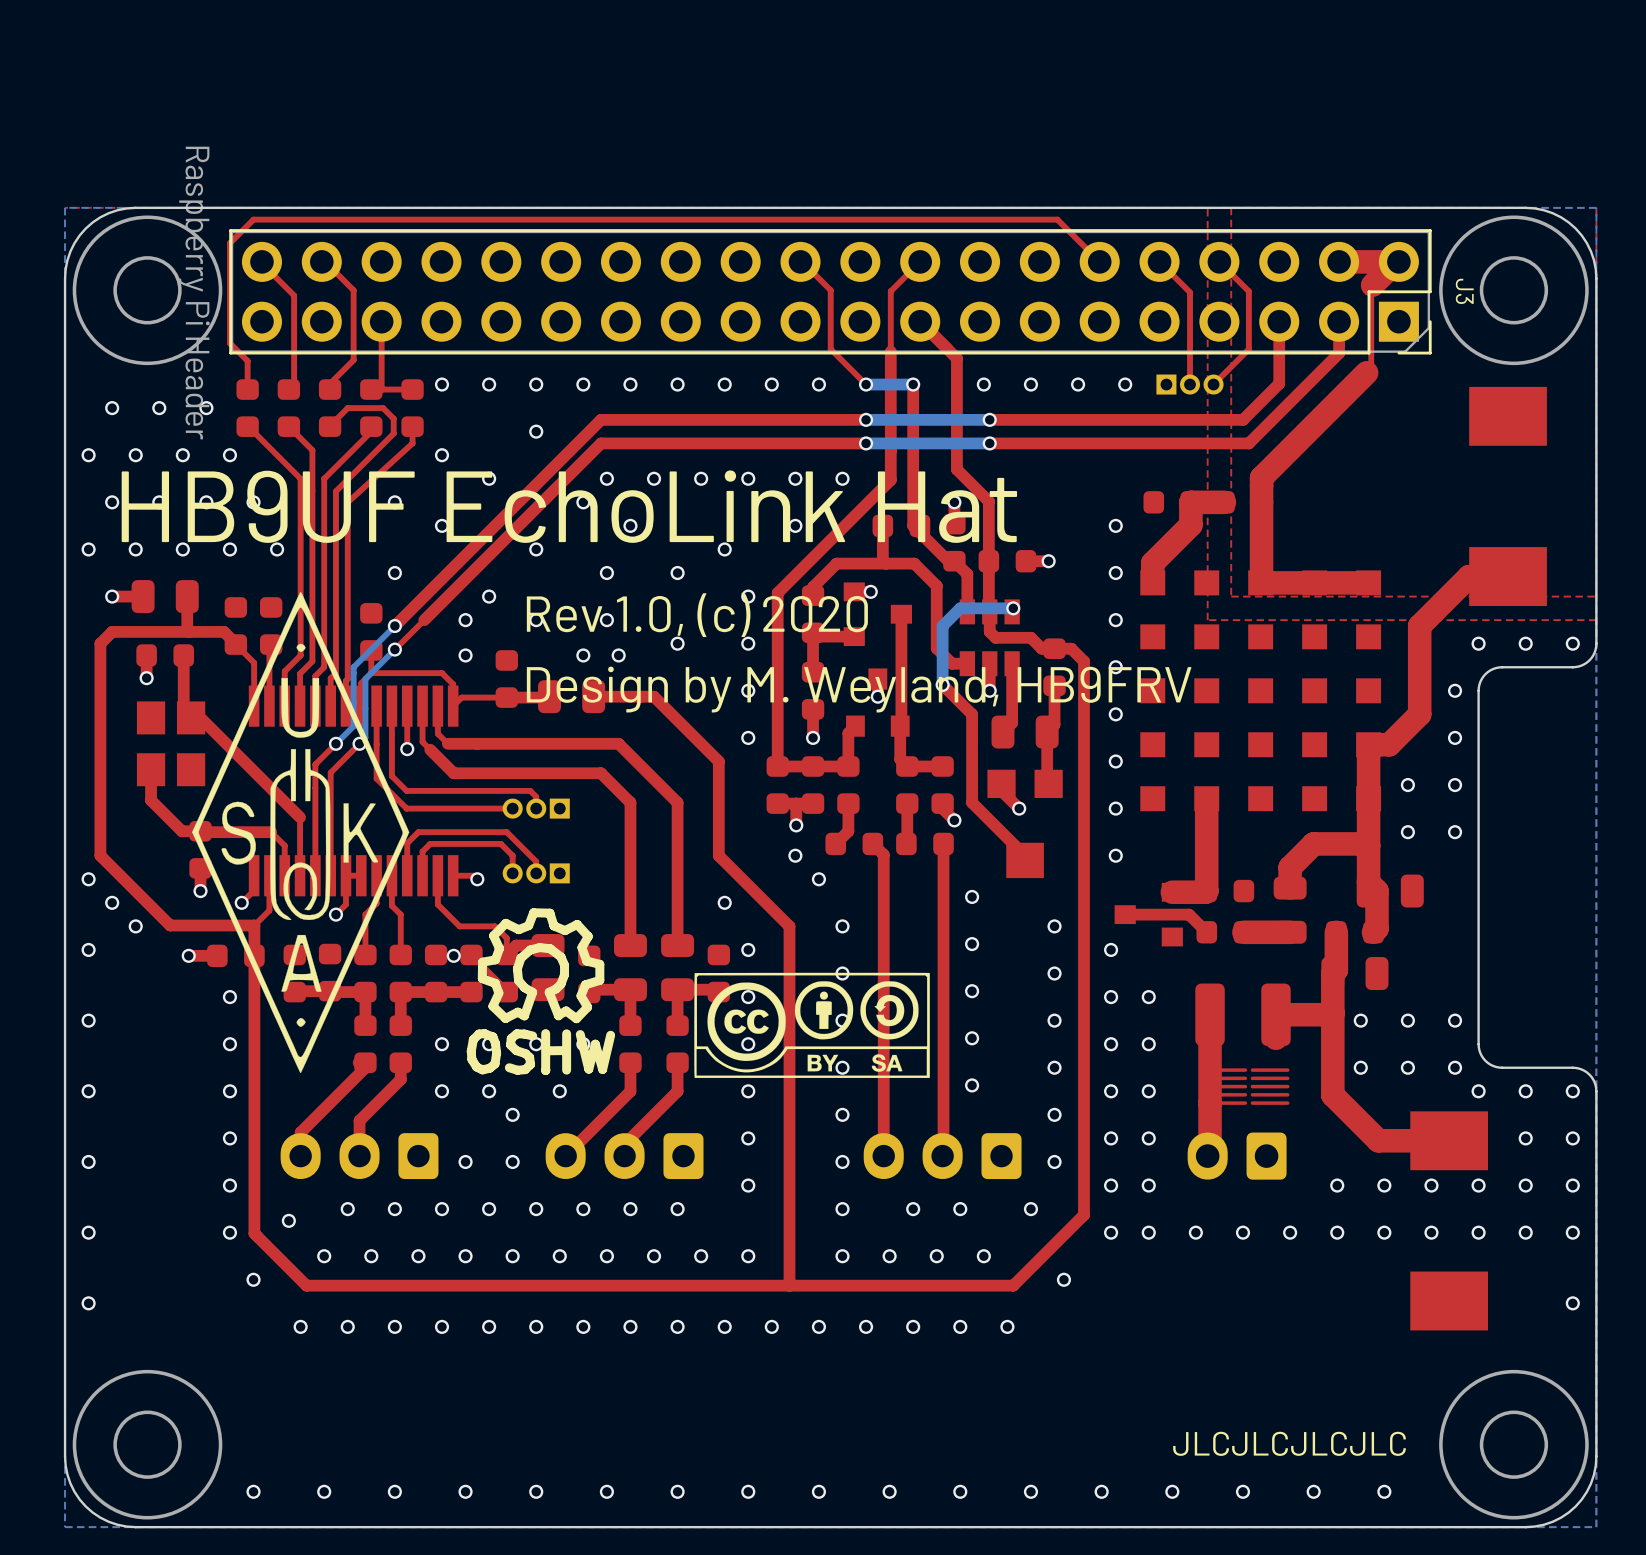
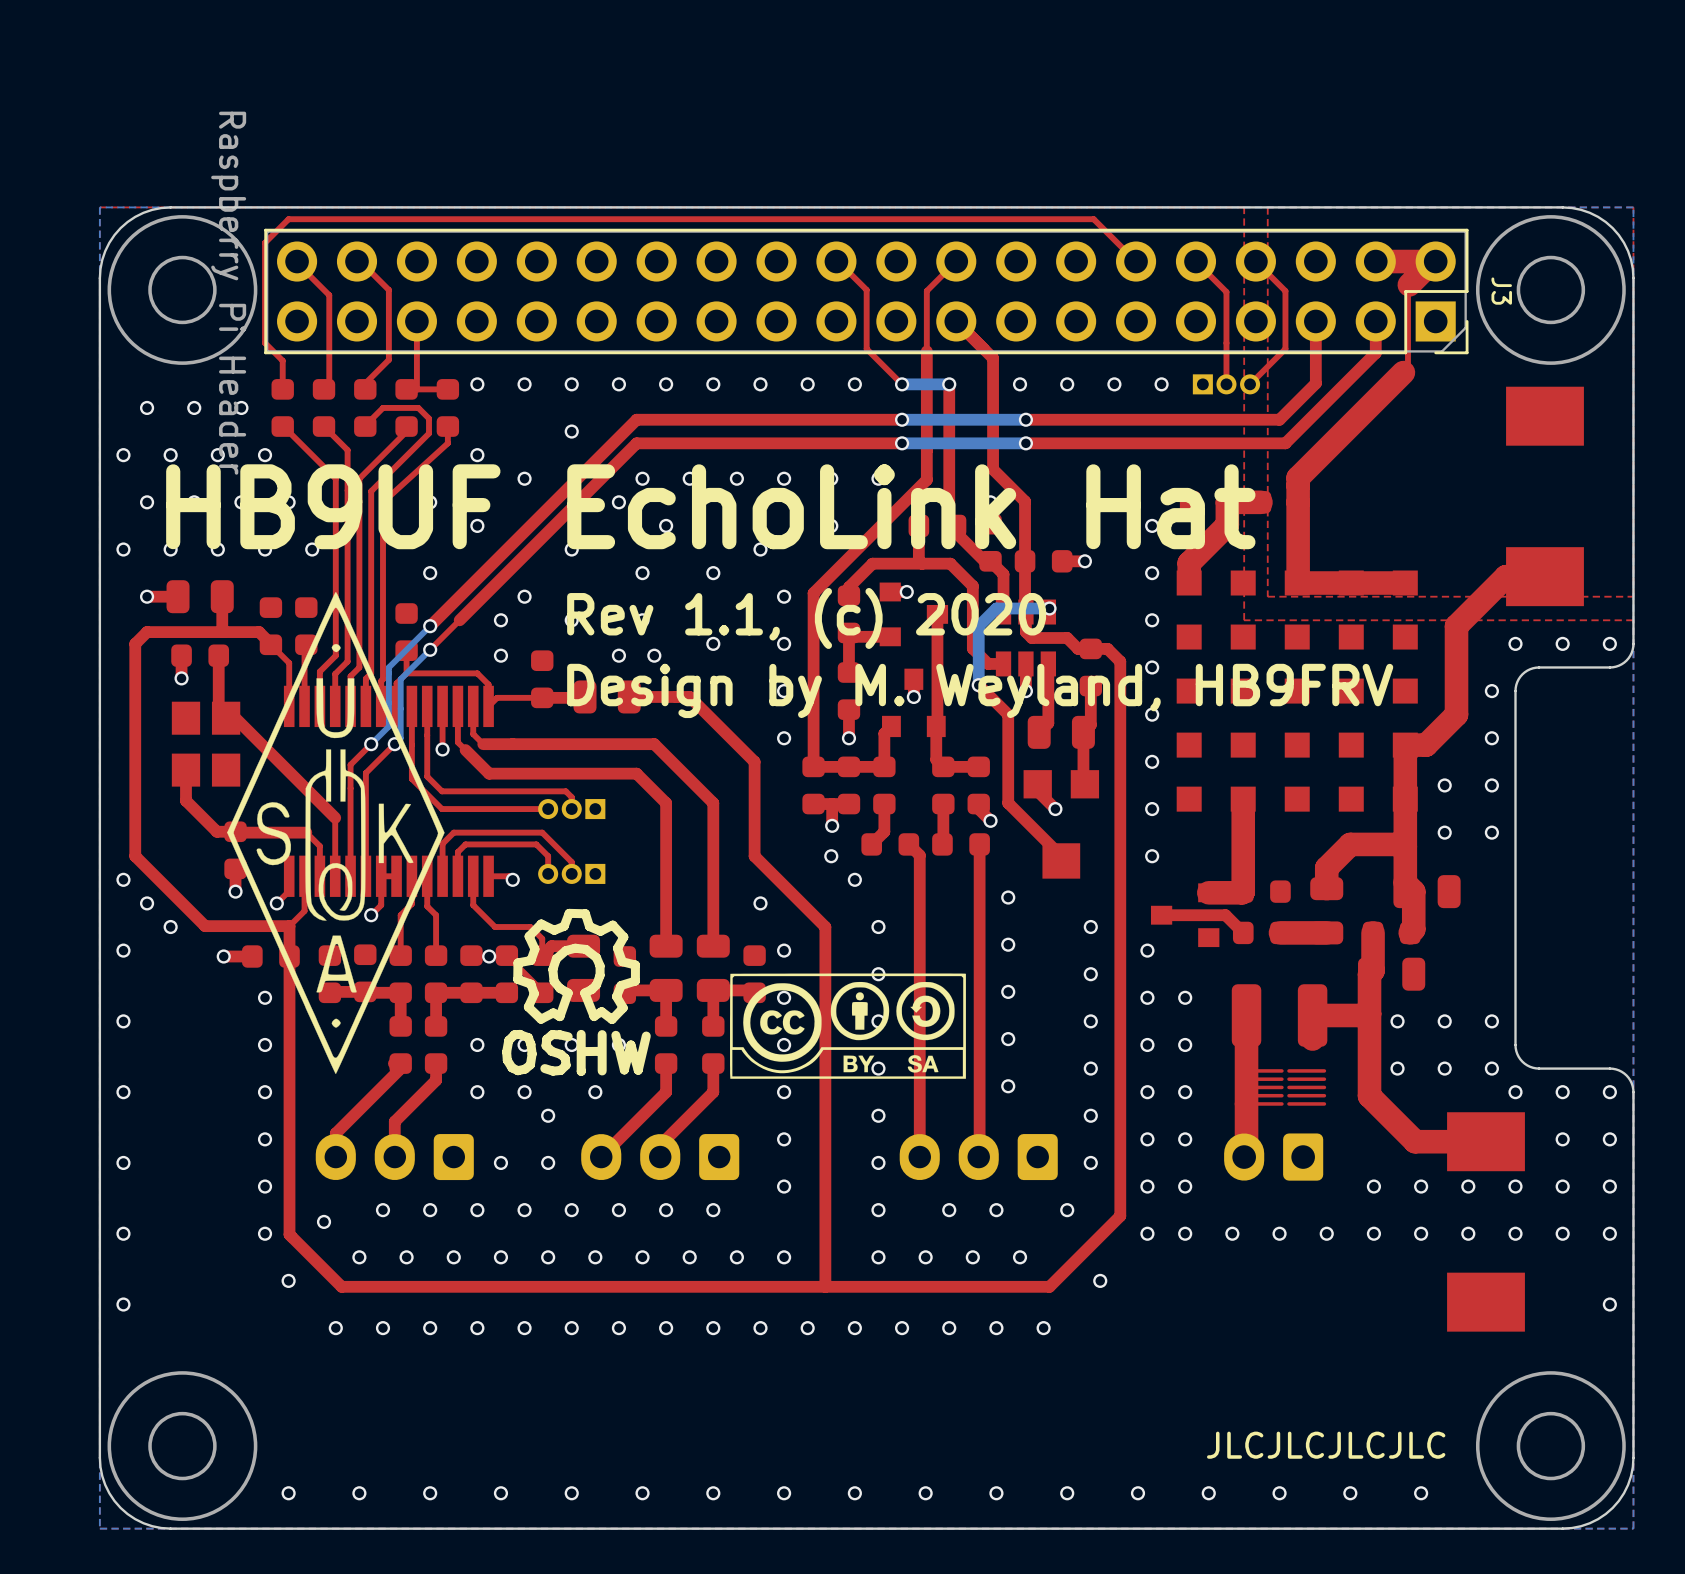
text: Rev 1.0, (c) 2020 (697, 615) -> Rev 1.1, (c) 2020 (806, 618)

